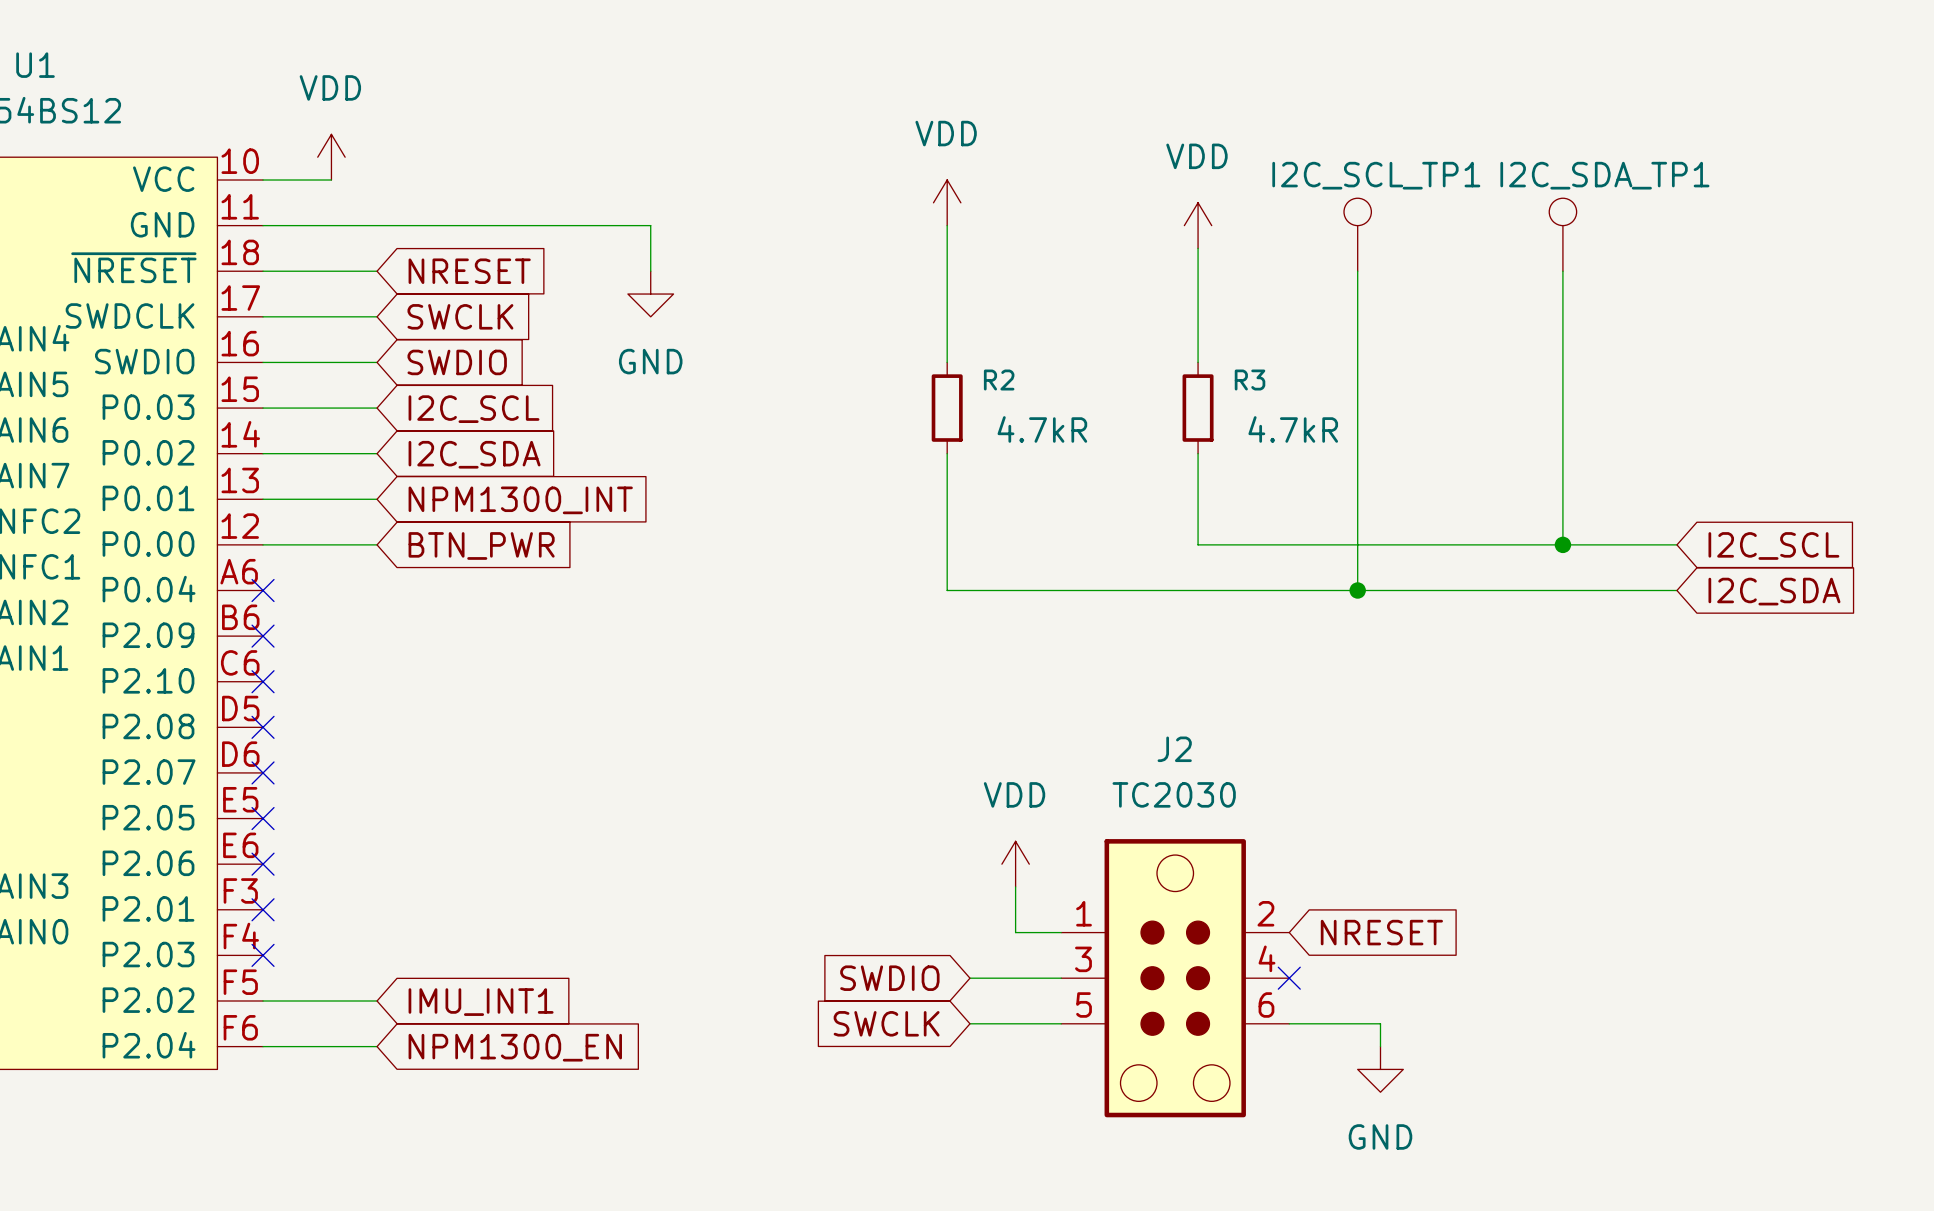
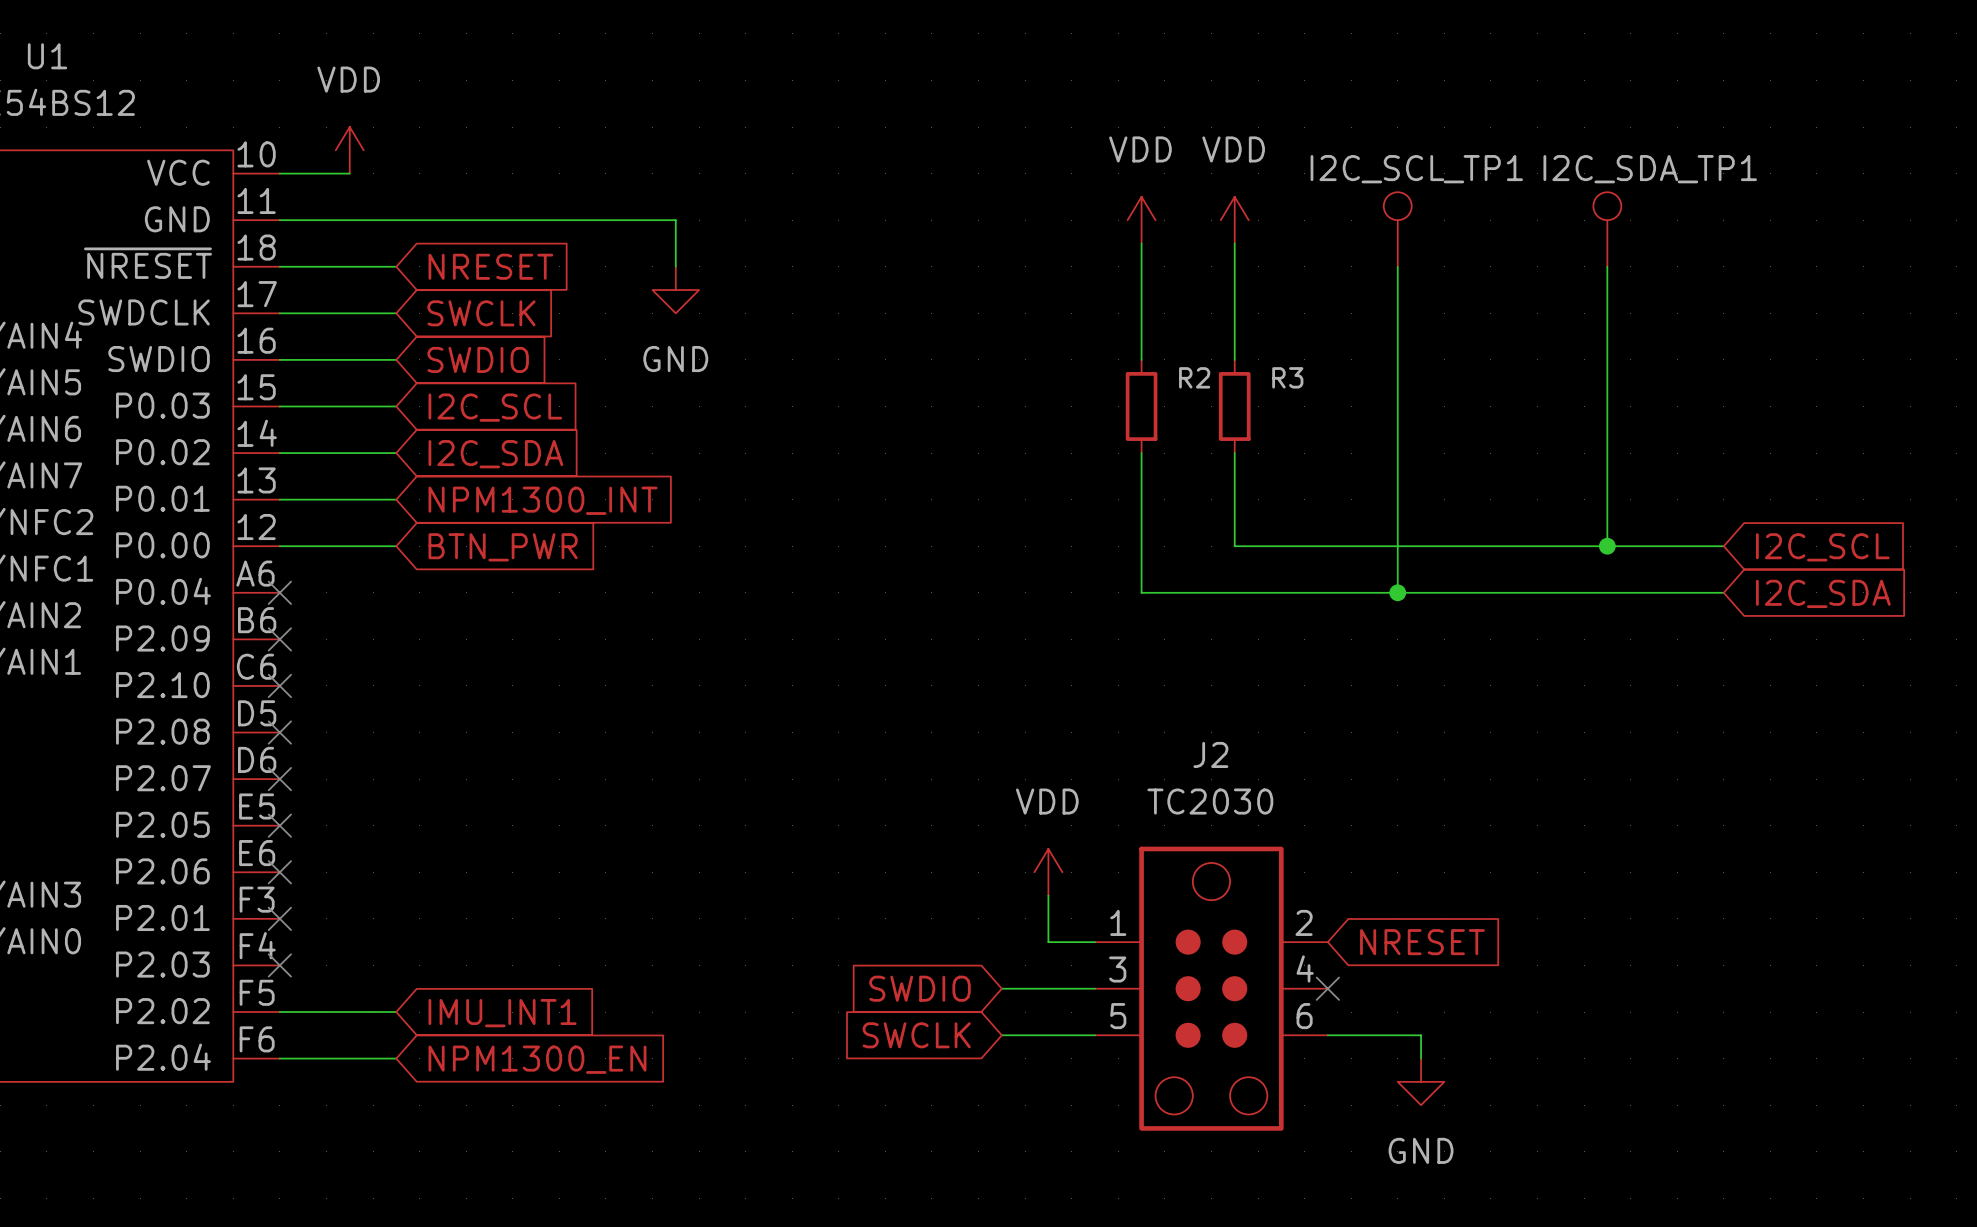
power symbol position: VDD (947, 202) -> VDD (1141, 220)
wire: (947, 225) (947, 362) -> none
wire: none -> (1141, 243) (1141, 359)
R2 position: (947, 408) -> (1141, 406)
R2 value: 4.7kR (1042, 429) -> none
R3 value: 4.7kR (1293, 429) -> none
wire: (947, 453) (947, 590) (1106, 590) -> (1141, 453) (1141, 592)

